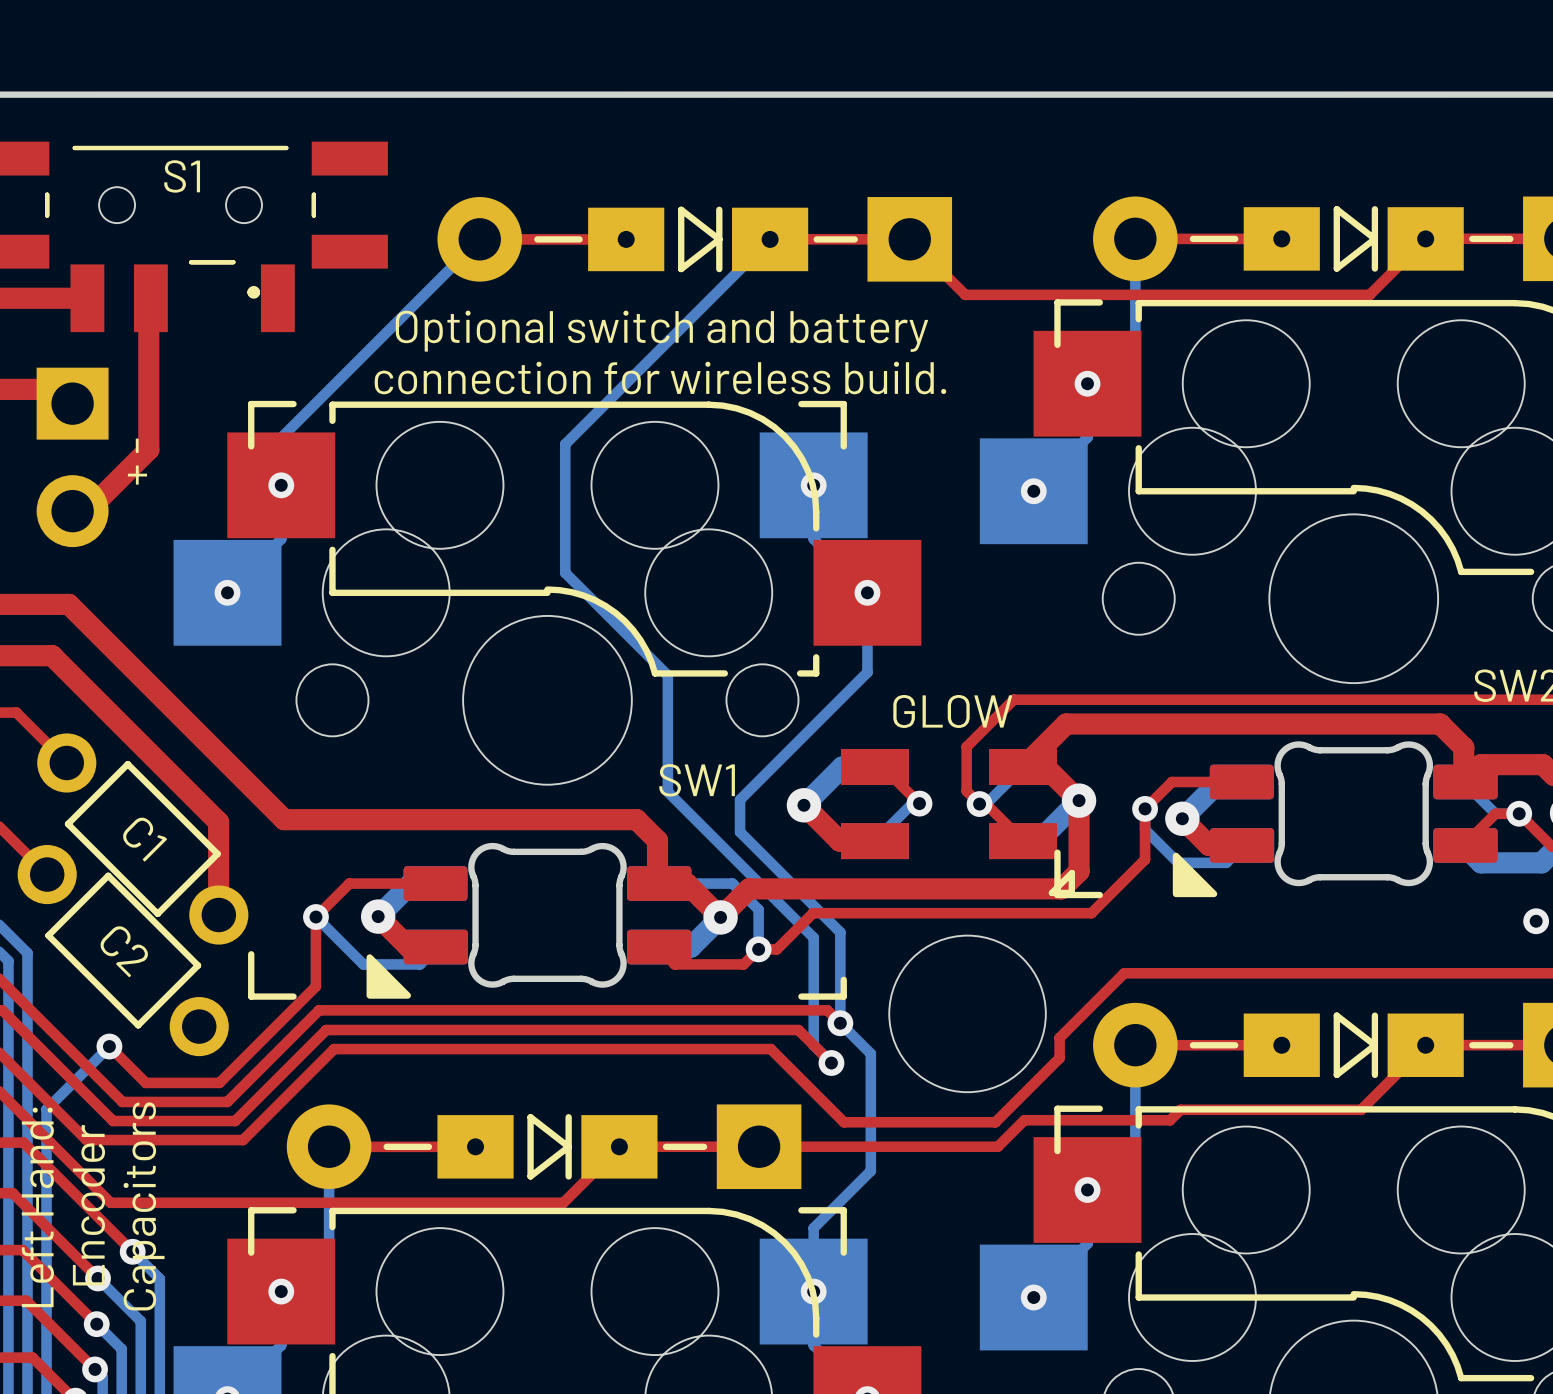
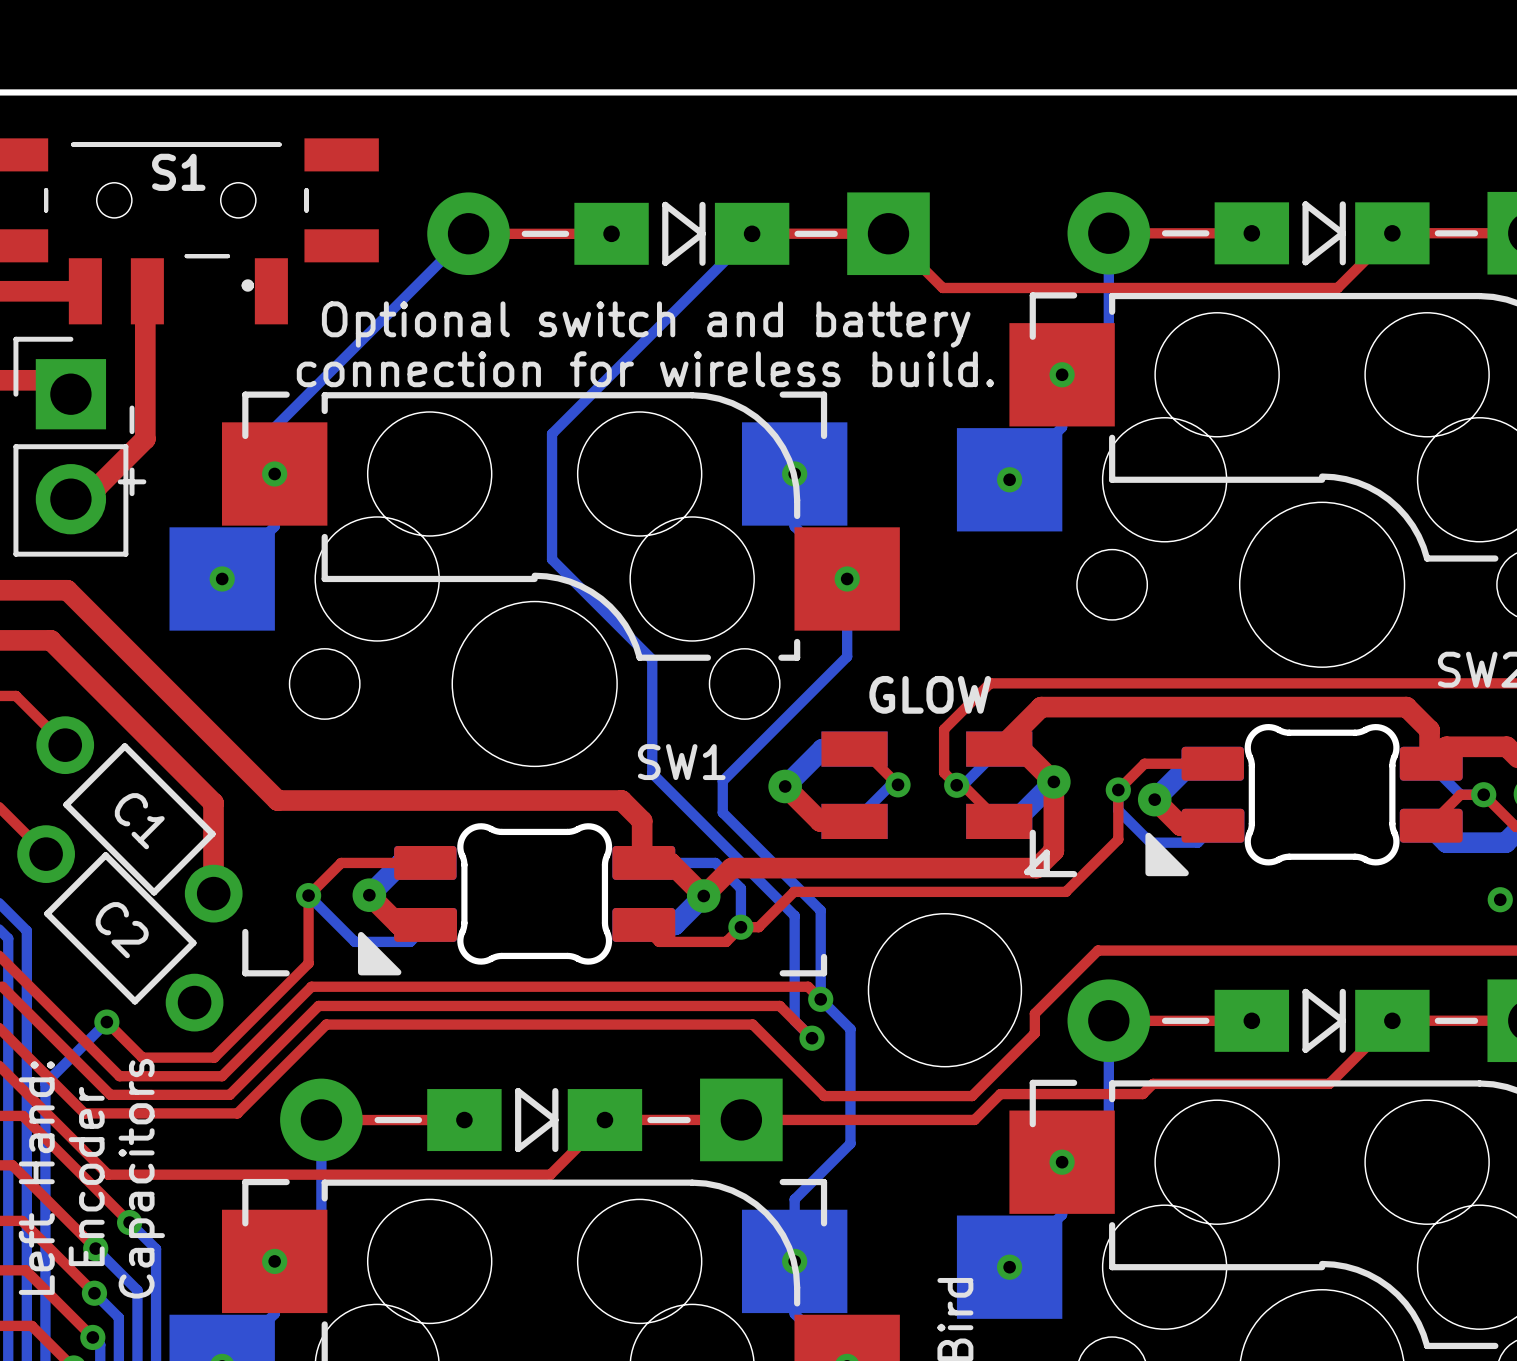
part footprint: [36, 367, 109, 548] -> [13, 336, 129, 557]

